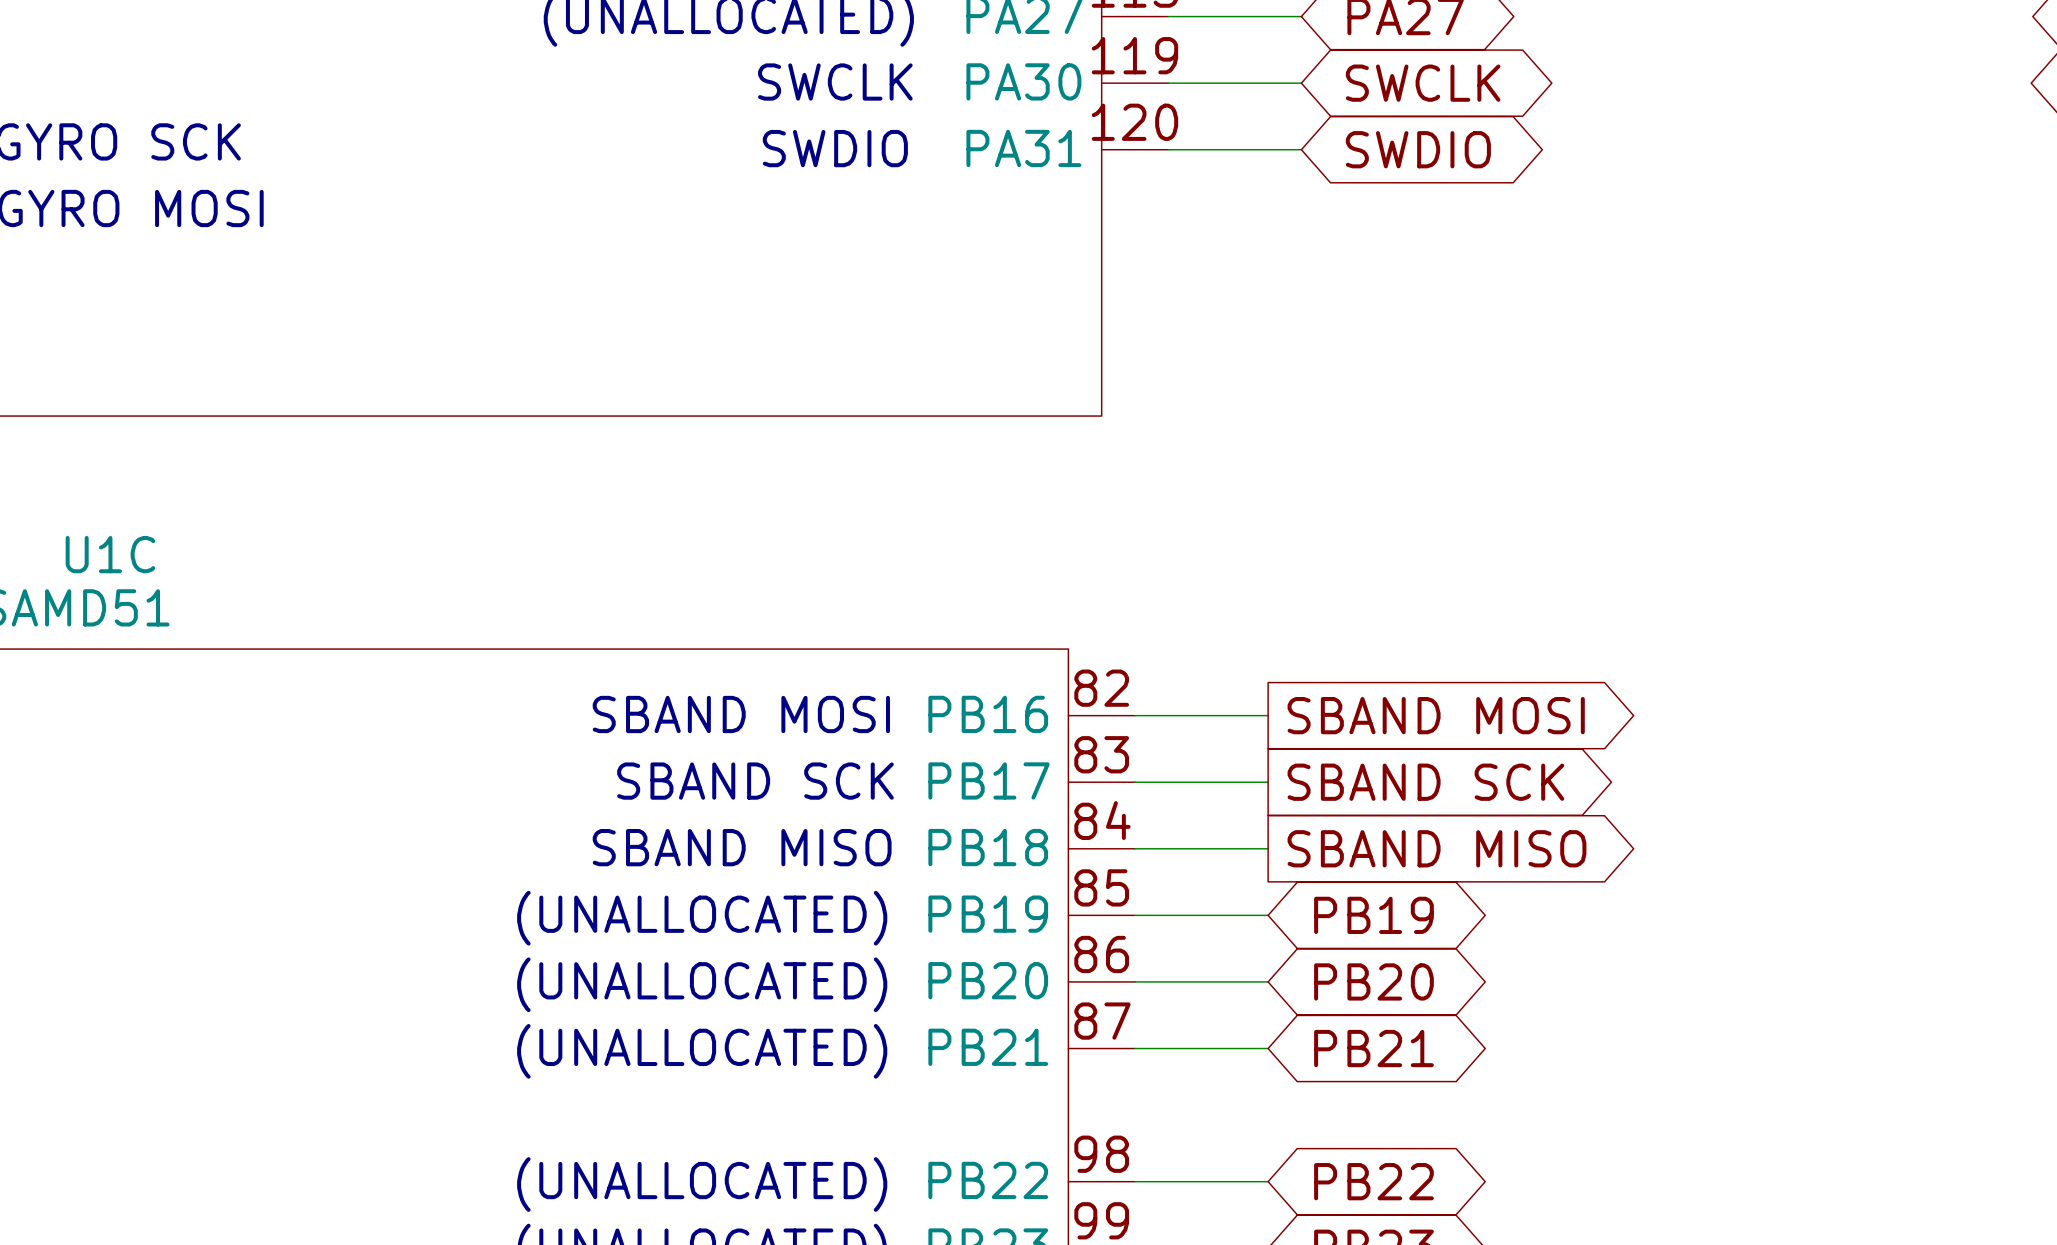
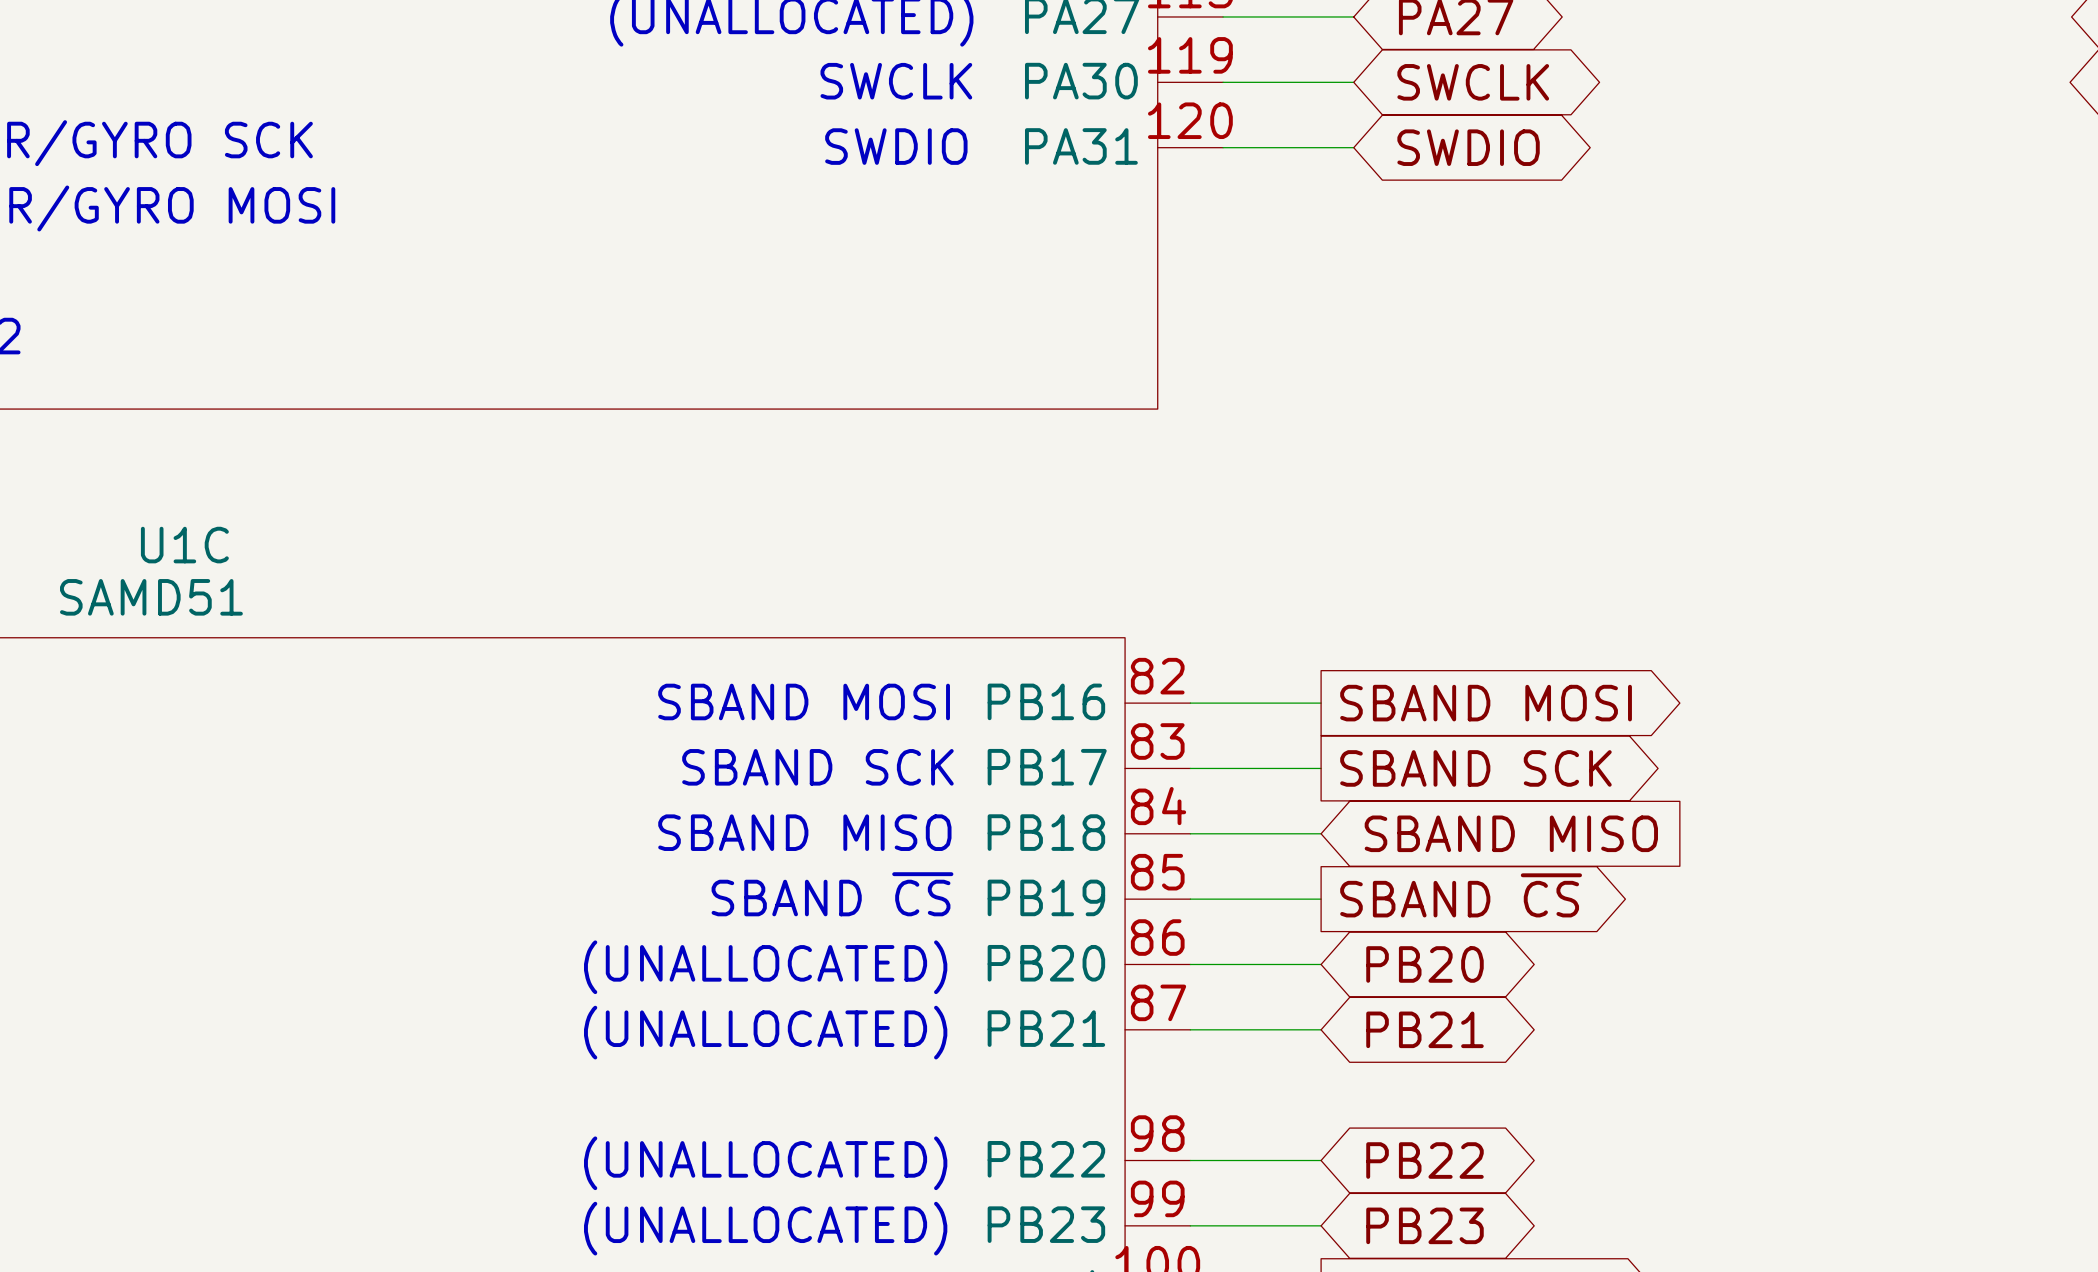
global label shape: output (1436, 848) -> input (1511, 833)
text: none -> SBAND ~{CS} (832, 894)
global label shape: bidirectional (1373, 915) -> output (1461, 895)
global label: PB19 (1373, 915) -> SBAND ~{CS} (1461, 895)
text: (UNALLOCATED) (702, 918) -> none

